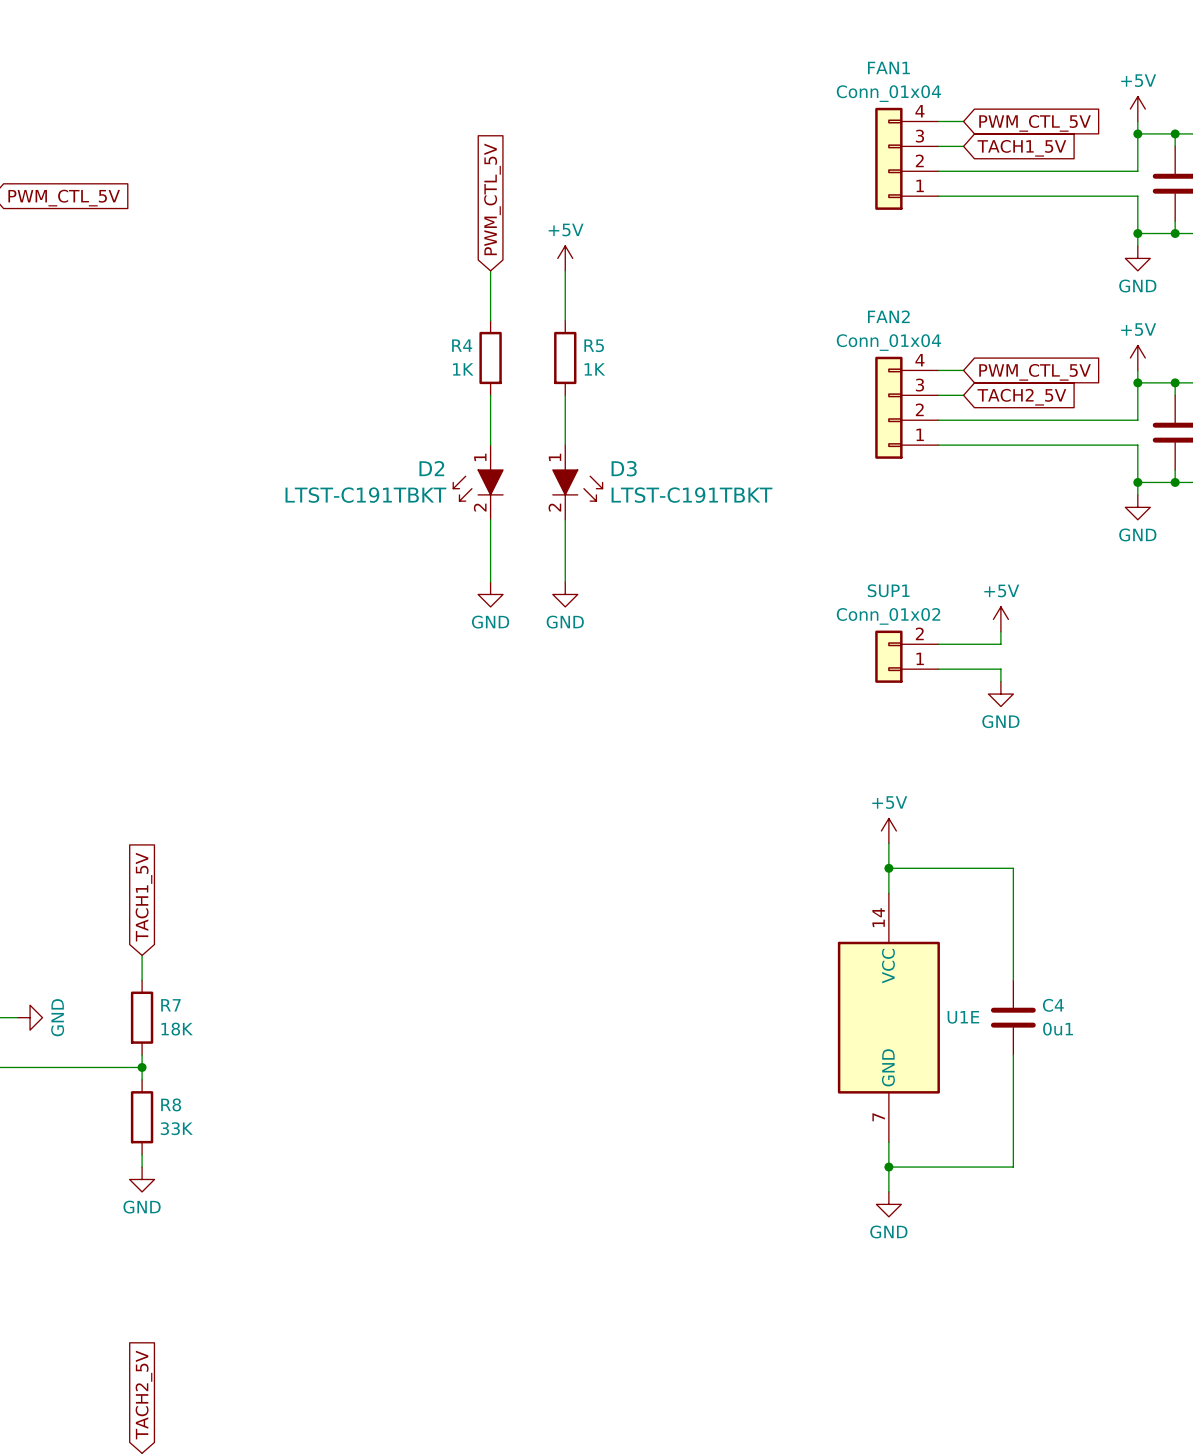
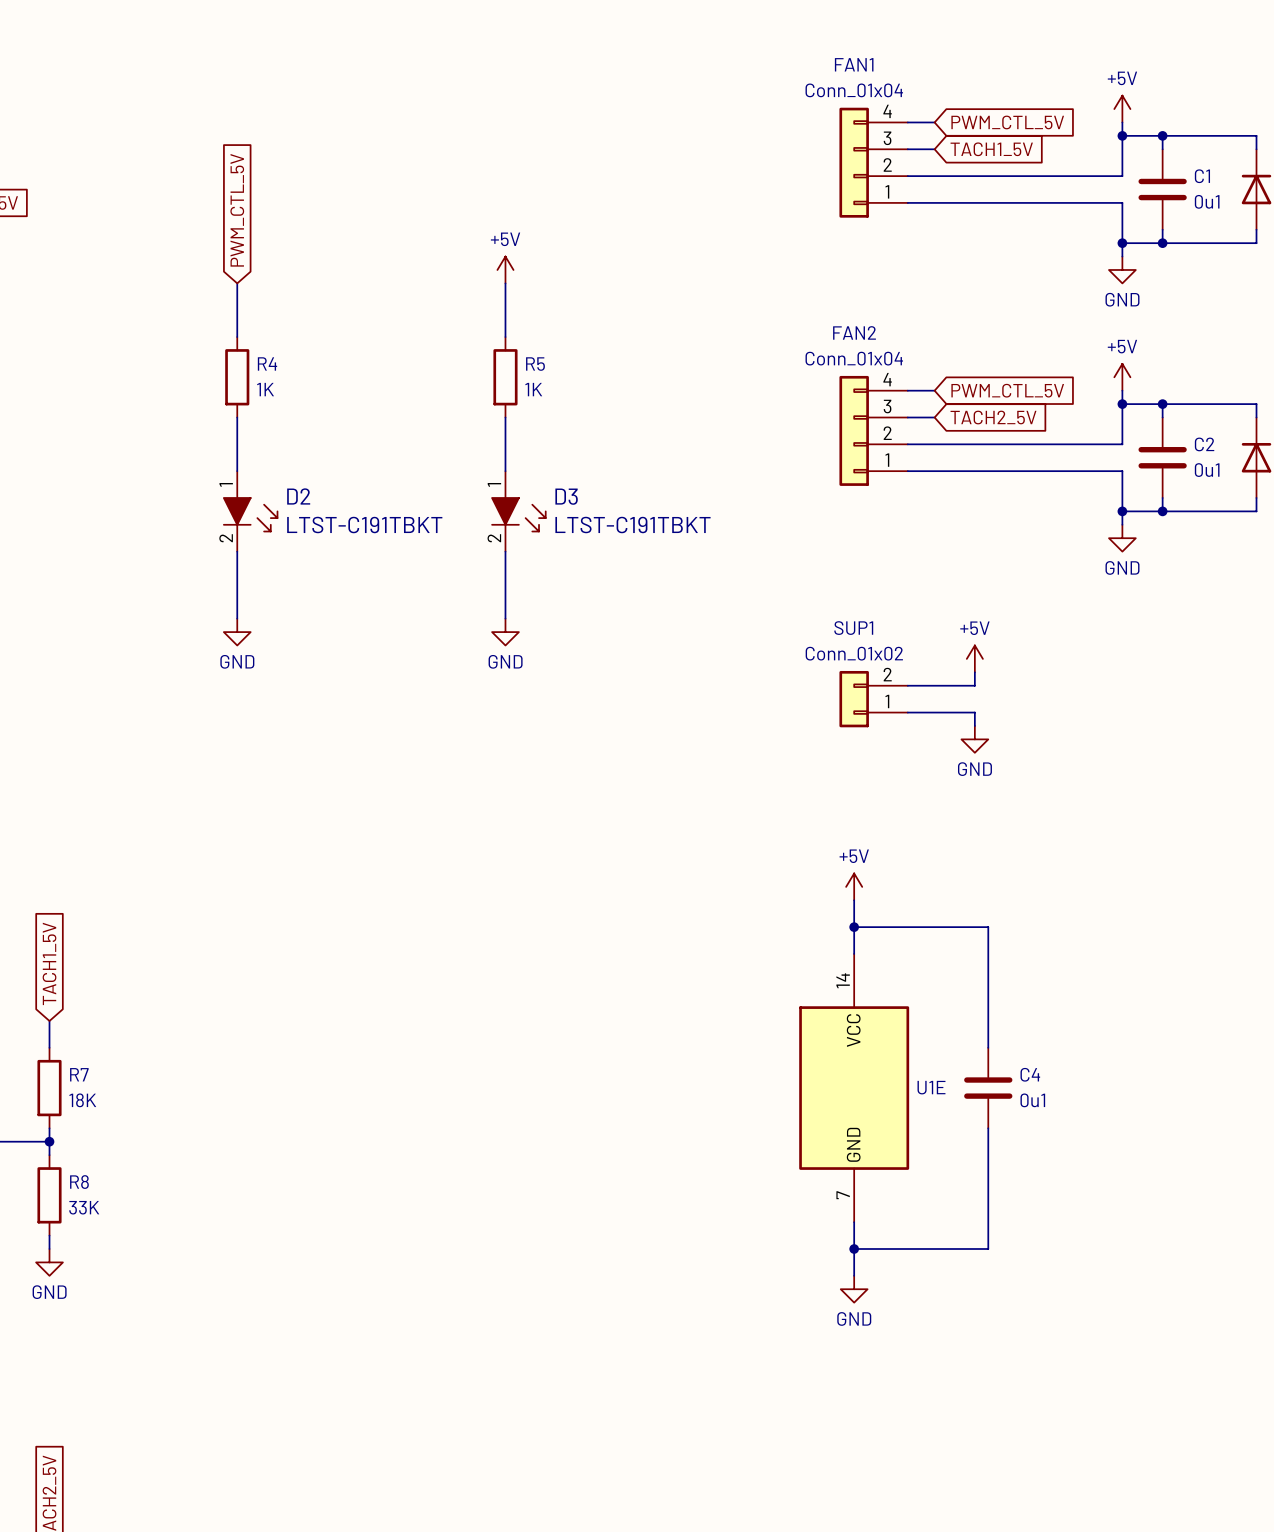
global label position: PWM_CTL_5V (492, 199) -> PWM_CTL_5V (237, 210)
wire: (490, 270) (490, 320) -> (237, 283) (237, 337)
R4 name position: R4 (462, 345) -> R4 (267, 363)
R4 position: (490, 357) -> (237, 377)
R4 value position: 1K (463, 369) -> 1K (265, 389)
wire: (490, 395) (490, 445) -> (237, 417) (237, 471)
D2 position: (478, 482) -> (250, 511)
D2 flip: as is (478, 485) -> left-right (250, 514)
wire: (490, 519) (490, 582) -> (237, 551) (237, 618)
power symbol position: GND (490, 594) -> GND (237, 632)

